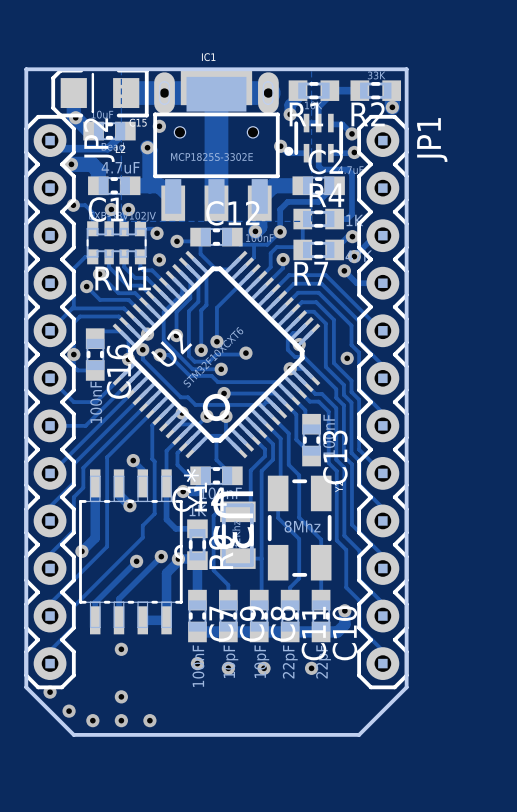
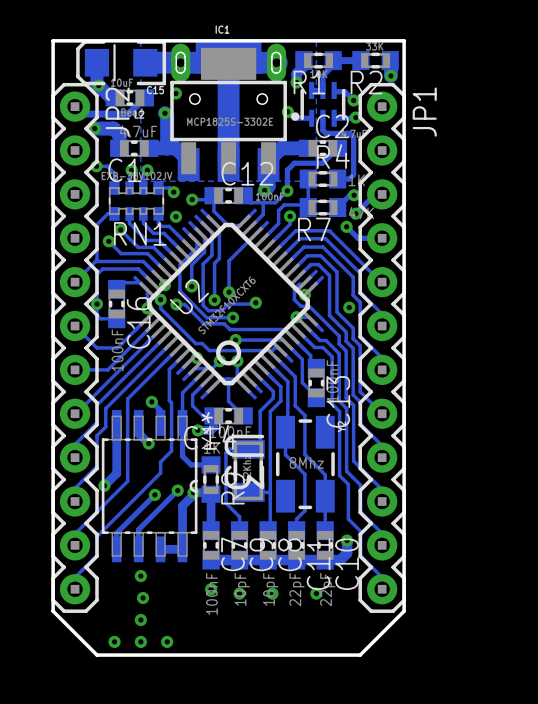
via: none -> (143, 598)
via: (50, 692) -> none
via: (69, 711) -> none

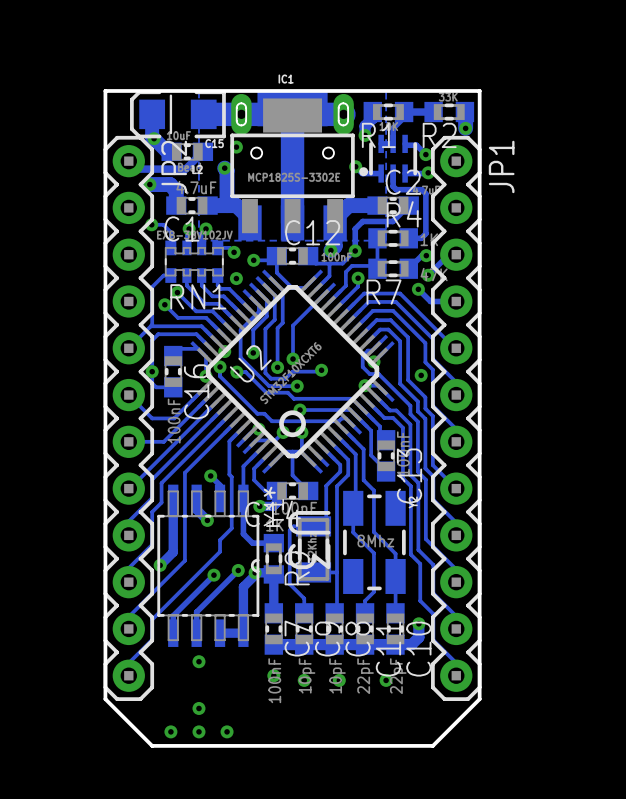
via: (143, 598) -> none

